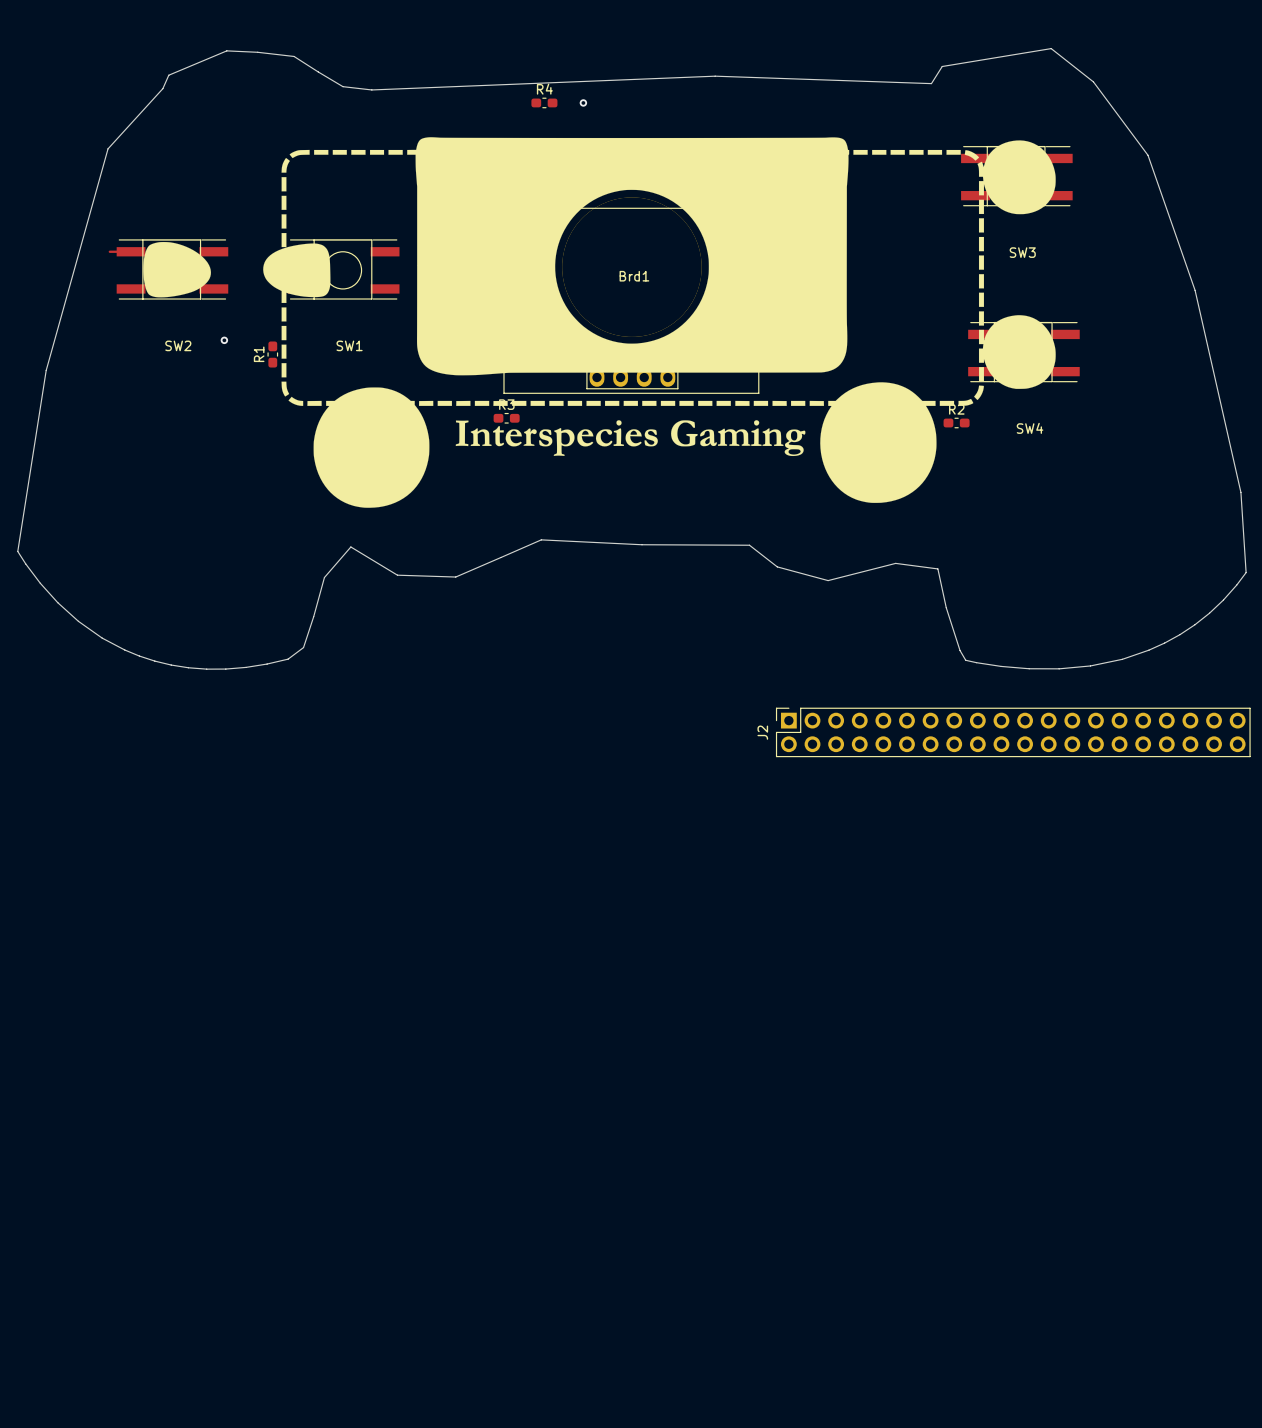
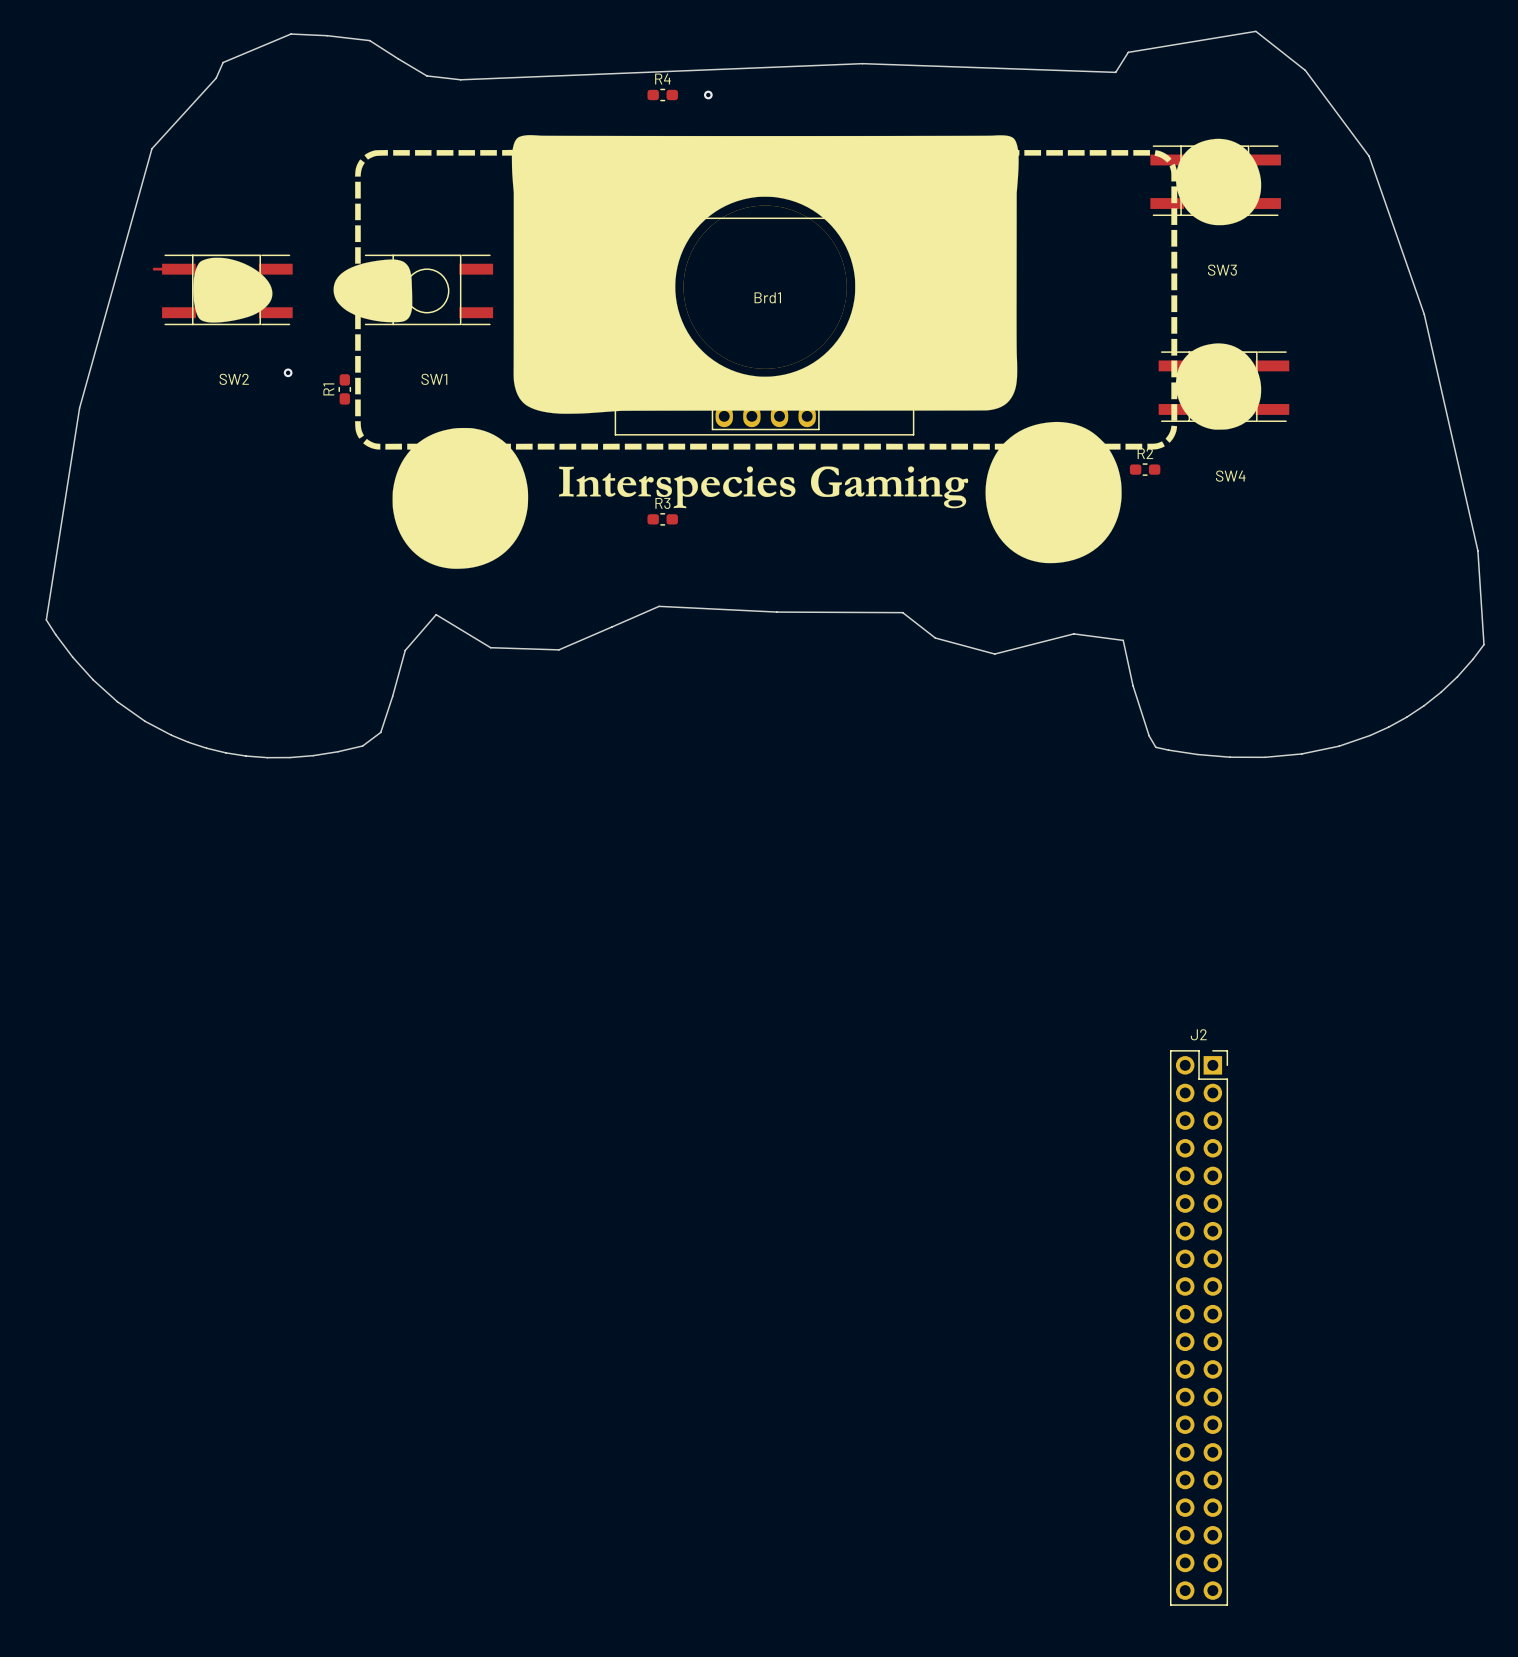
R3 position: (506, 418) -> (662, 519)
J2 rotation: 0° (1013, 732) -> 90° clockwise (1199, 1327)
J2 position: (1013, 732) -> (1199, 1327)

